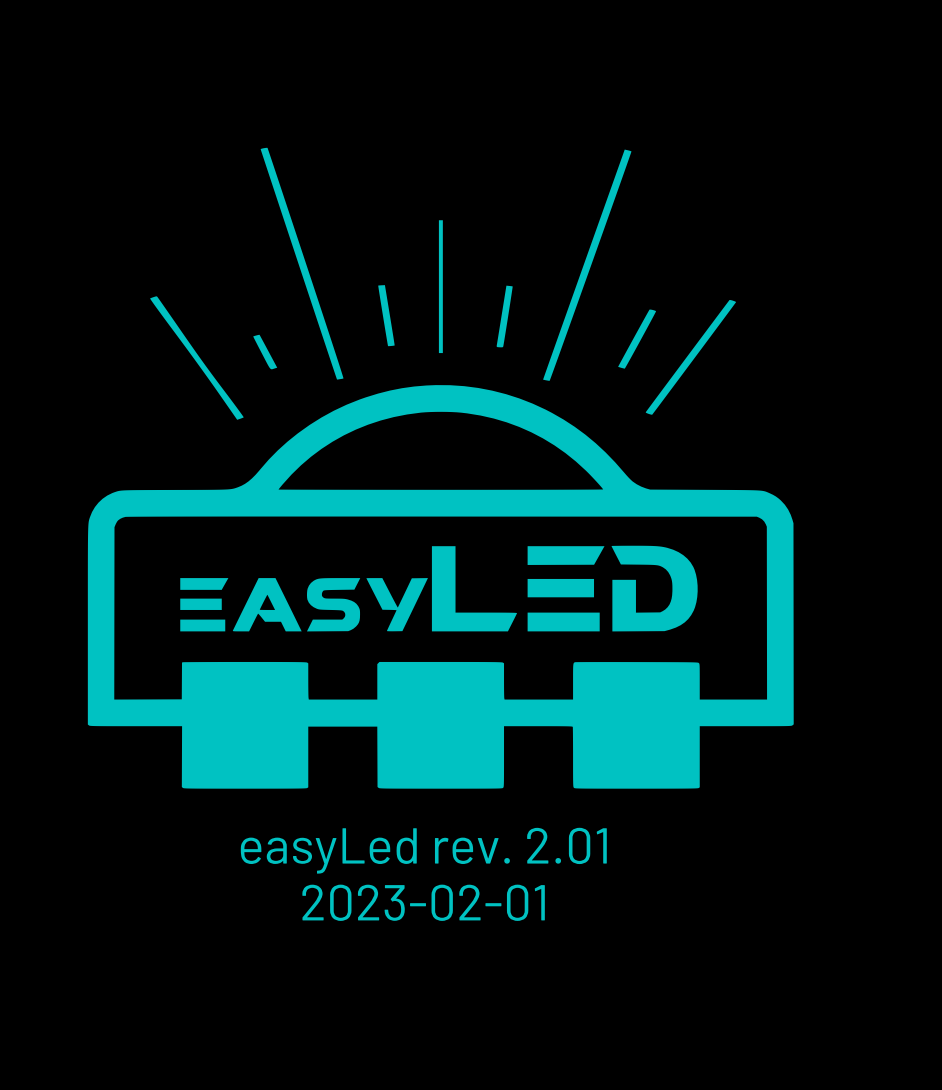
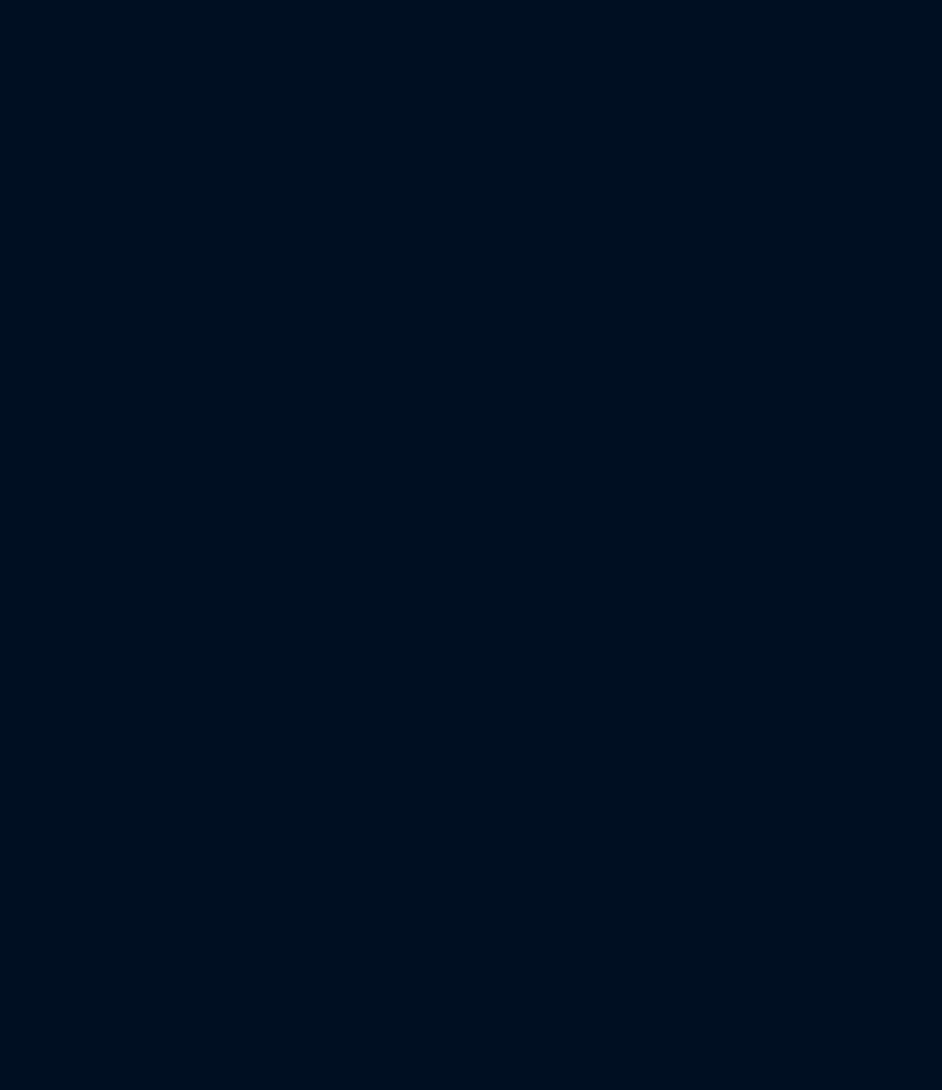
drawing: [87, 147, 794, 789] -> none
text: easyLed rev. 2.01 (423, 850) -> none
text: 2023-02-01 (423, 902) -> none

